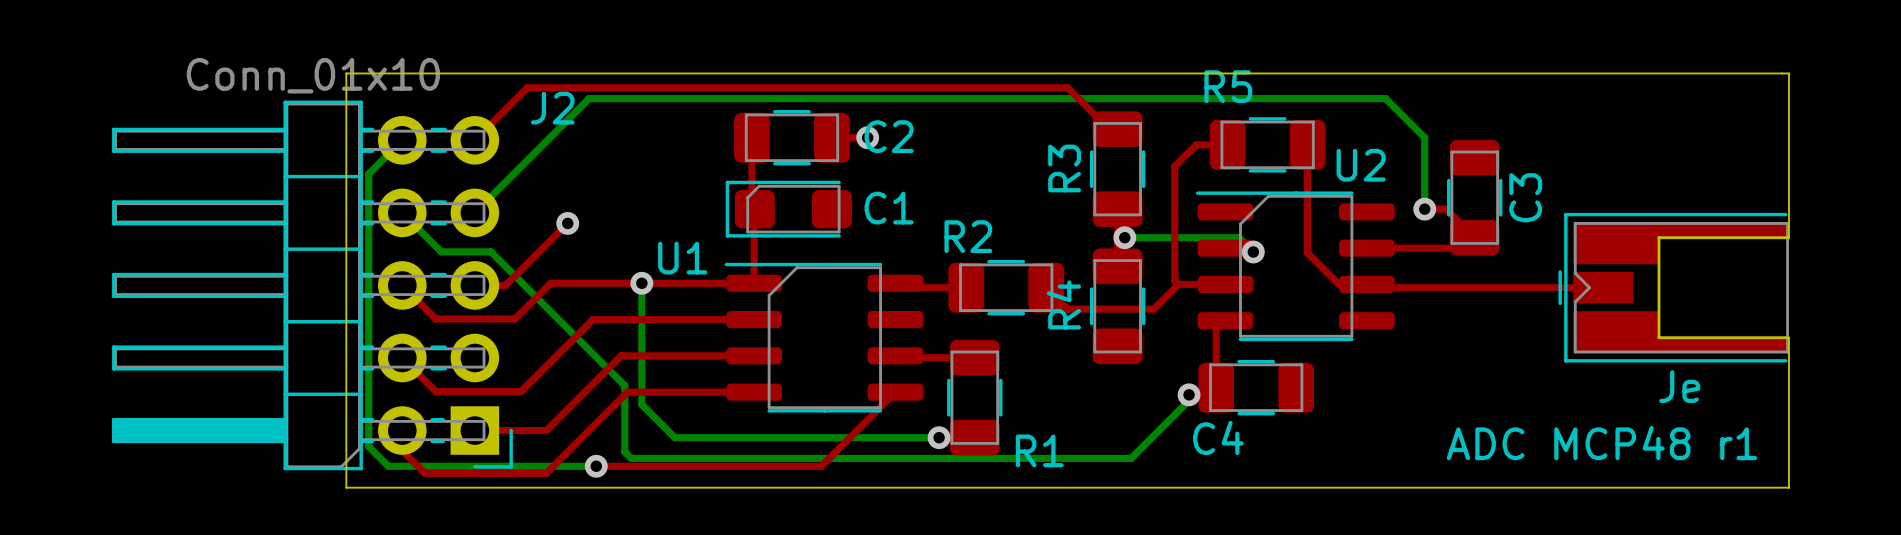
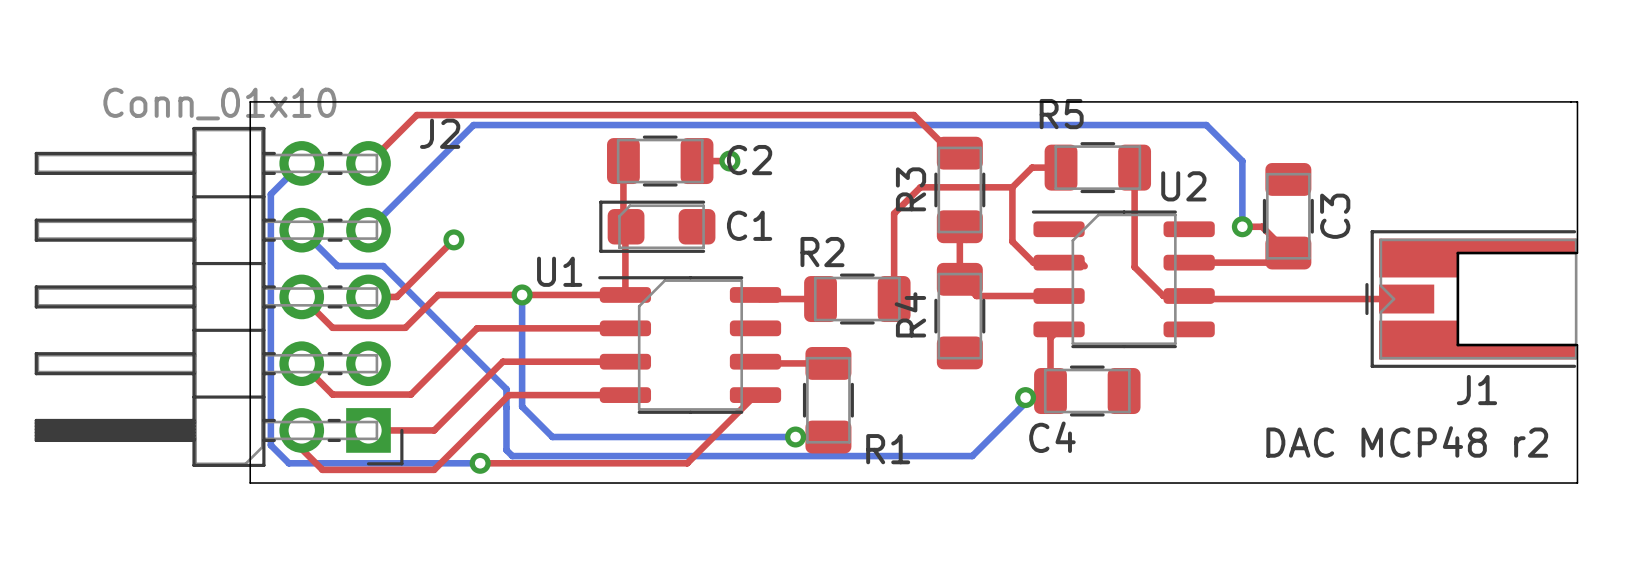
top track: (1174, 225) (1174, 280) (1178, 284) (1153, 309) (1067, 309) (1046, 287) -> (1012, 187) (920, 187) (894, 213) (894, 299)
top track: none -> (1012, 241) (1033, 262) (1059, 262)
bottom track: (1124, 237) (1239, 237) (1253, 252) -> none
via: (1124, 237) -> none
via: (1253, 252) -> none
top track: none -> (959, 279) (976, 296) (1015, 296)
Je name: Je (1679, 386) -> J1 (1476, 390)
text: ADC MCP48 r1 (1601, 443) -> DAC MCP48 r2 (1407, 441)

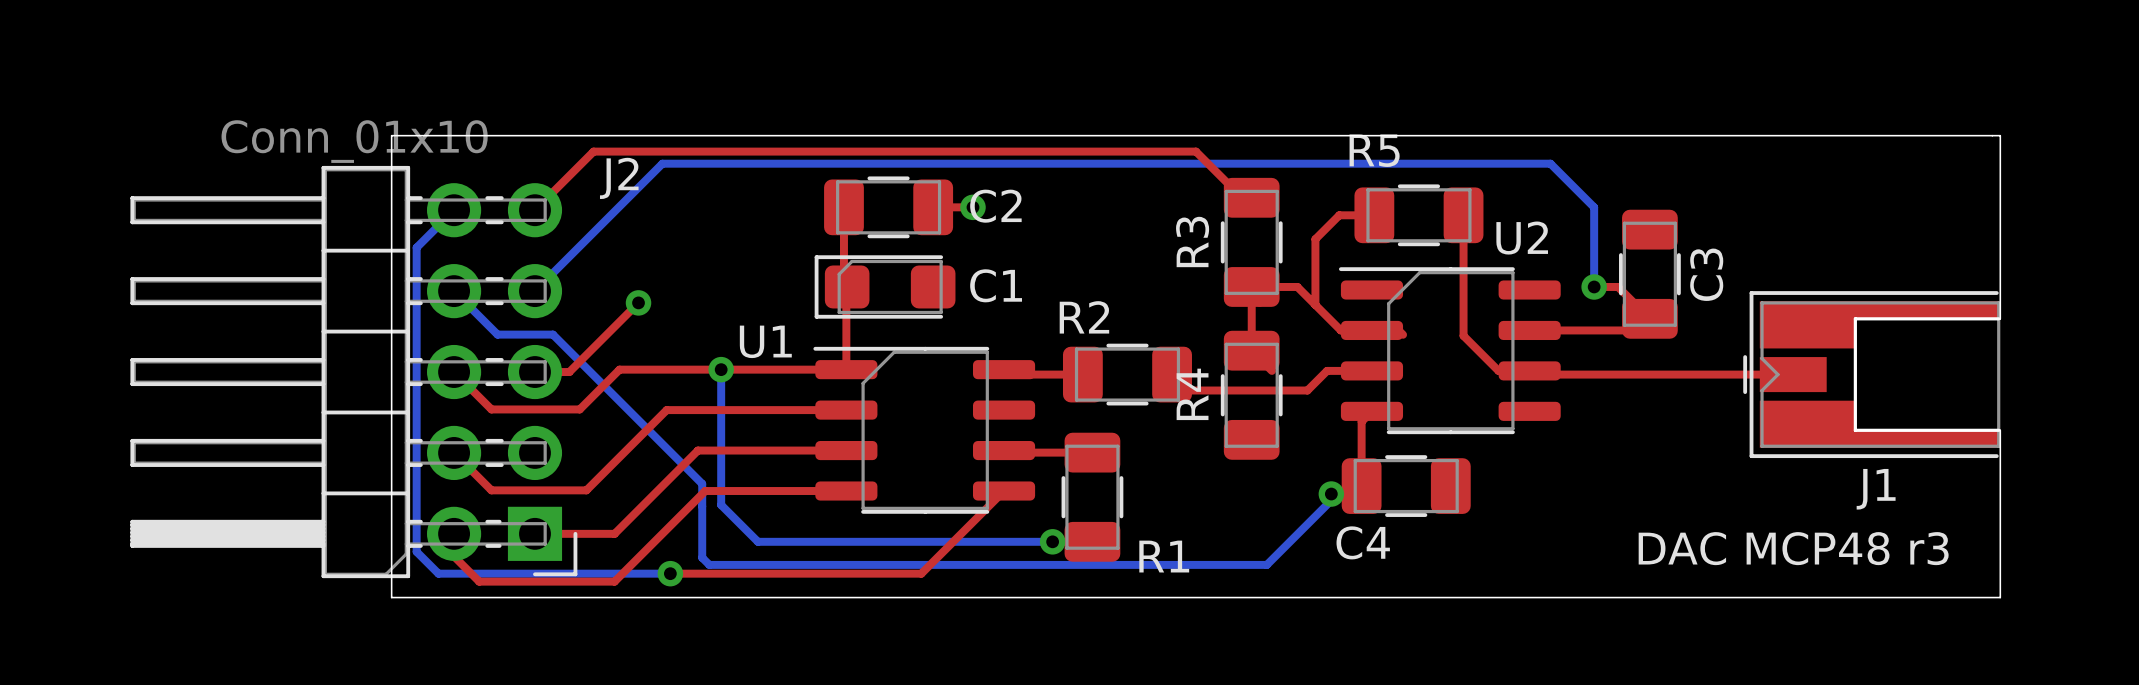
top track: (1012, 187) (920, 187) (894, 213) (894, 299) -> none
top track: none -> (1251, 286) (1297, 286) (1315, 304)
top track: (976, 296) (1021, 296) -> (1172, 374) (1188, 390) (1307, 390) (1327, 370)
text: DAC MCP48 r2 (1407, 441) -> DAC MCP48 r3 (1793, 548)

